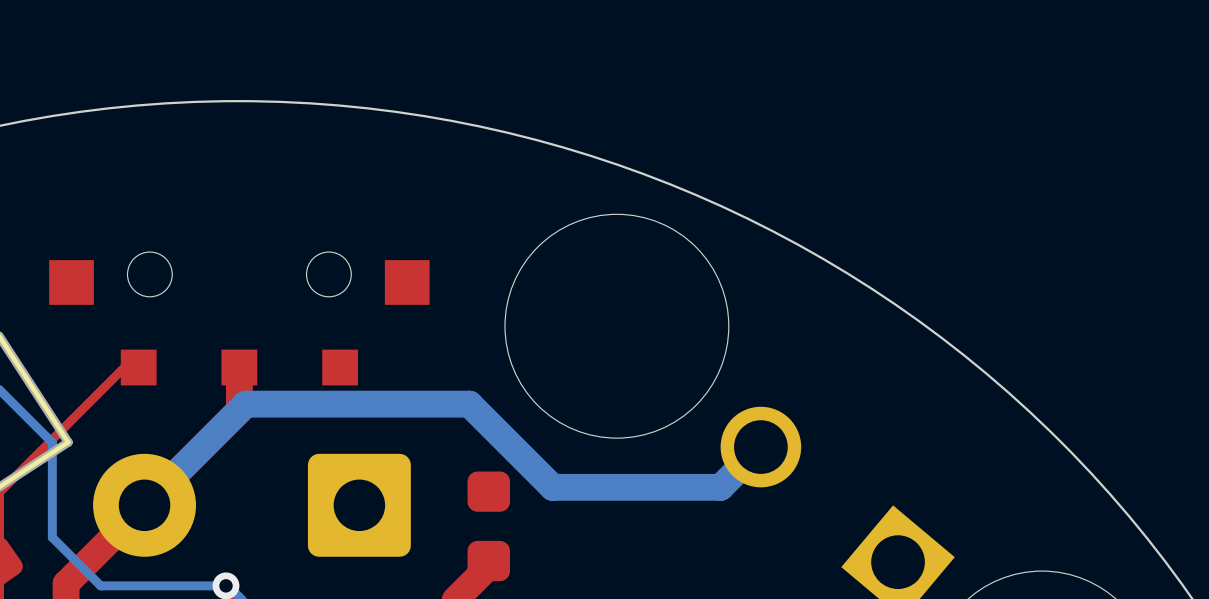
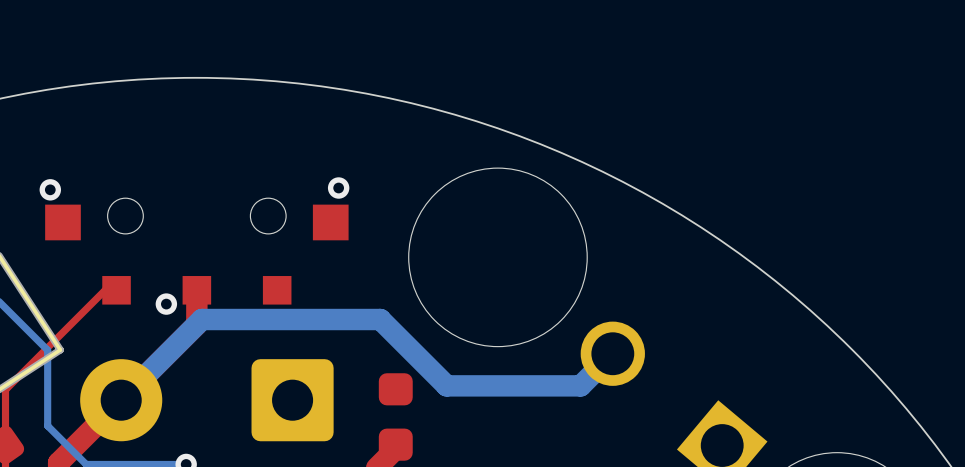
via: none -> (338, 188)
via: none -> (50, 189)
via: none -> (166, 304)

